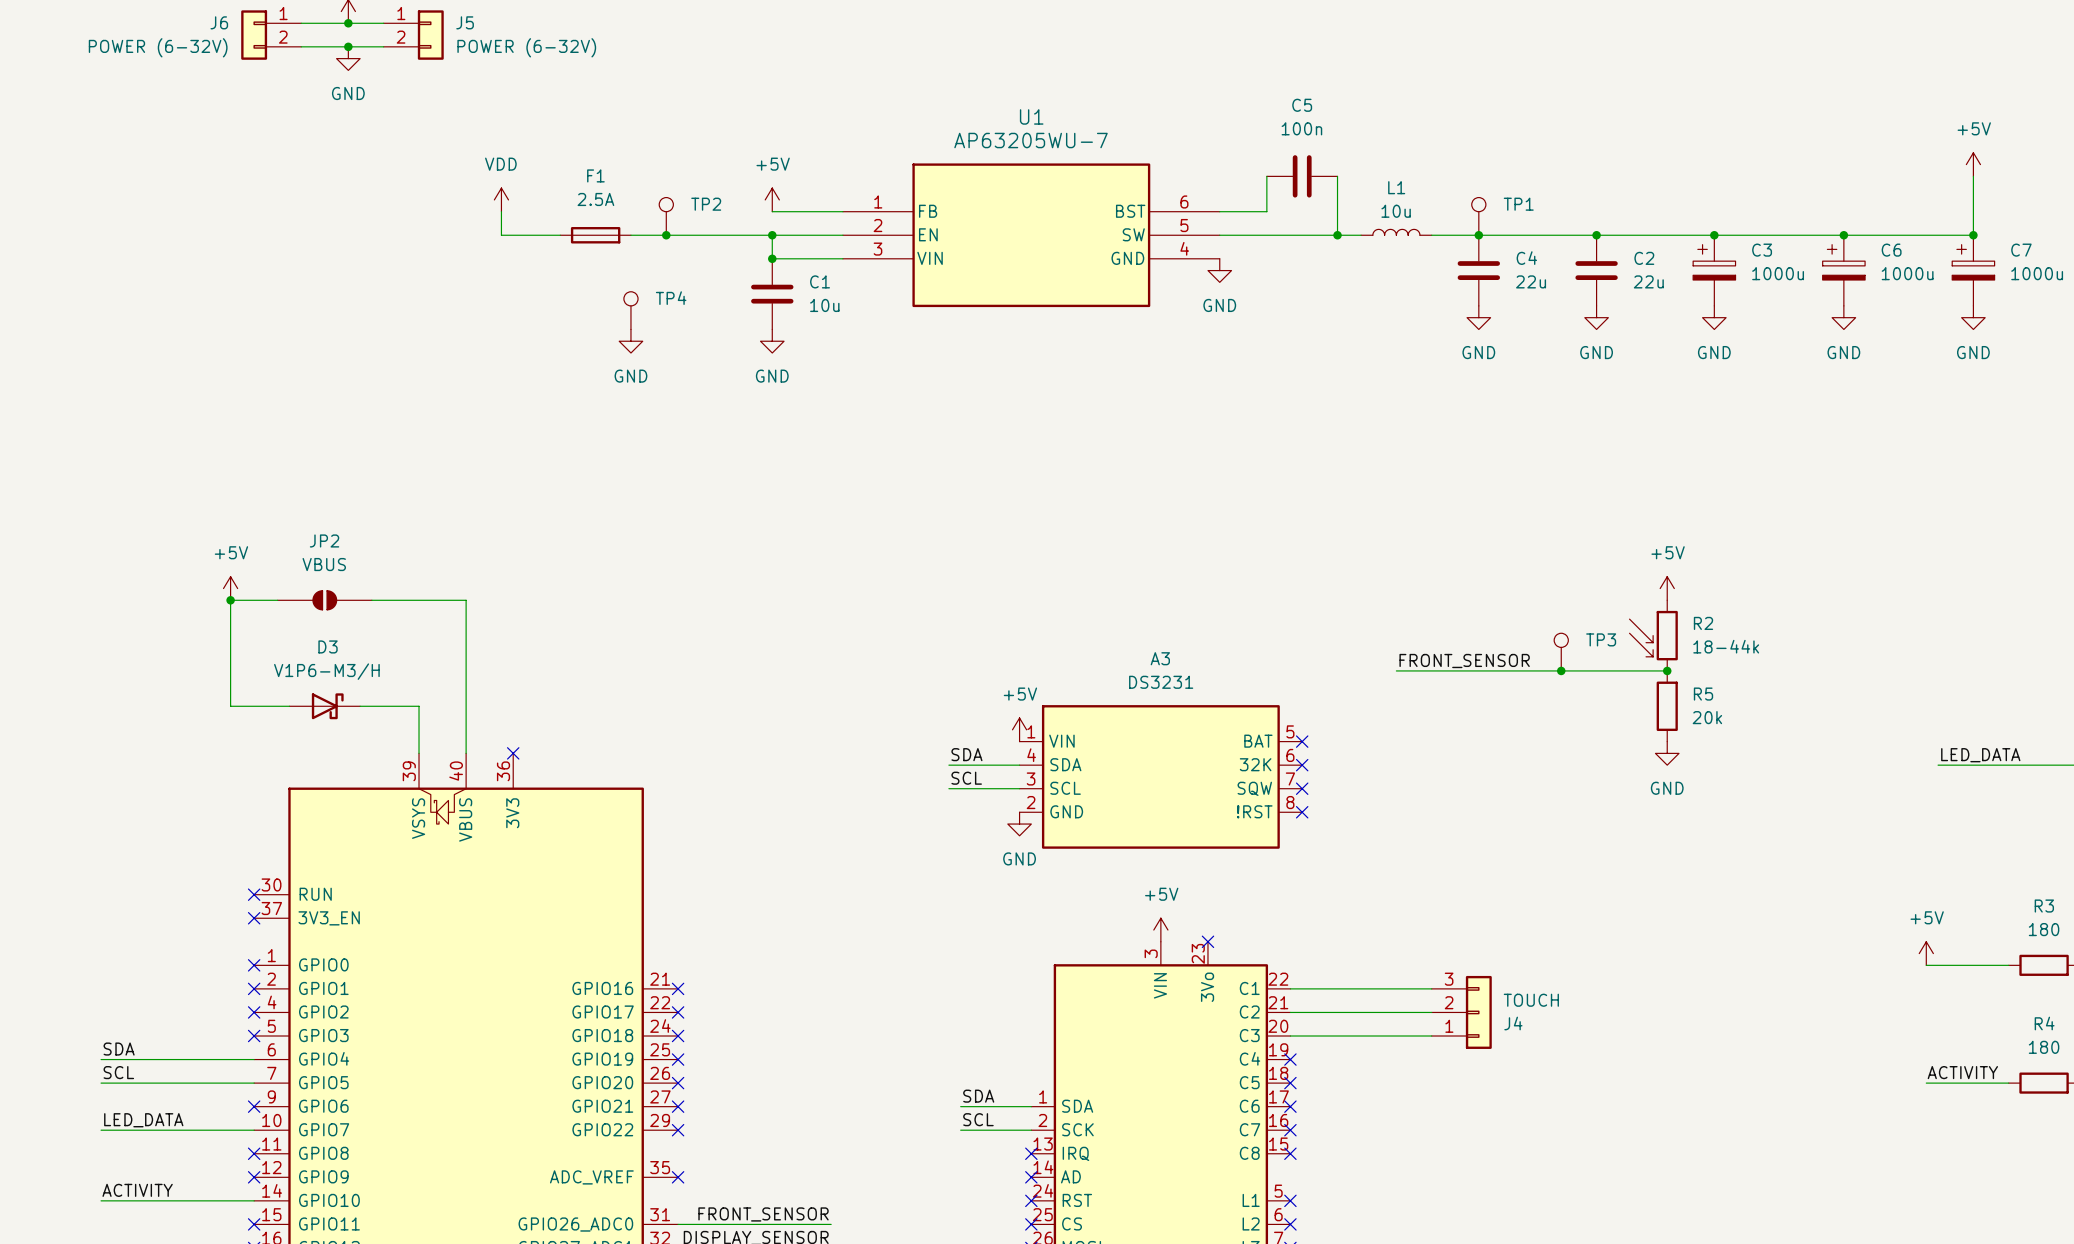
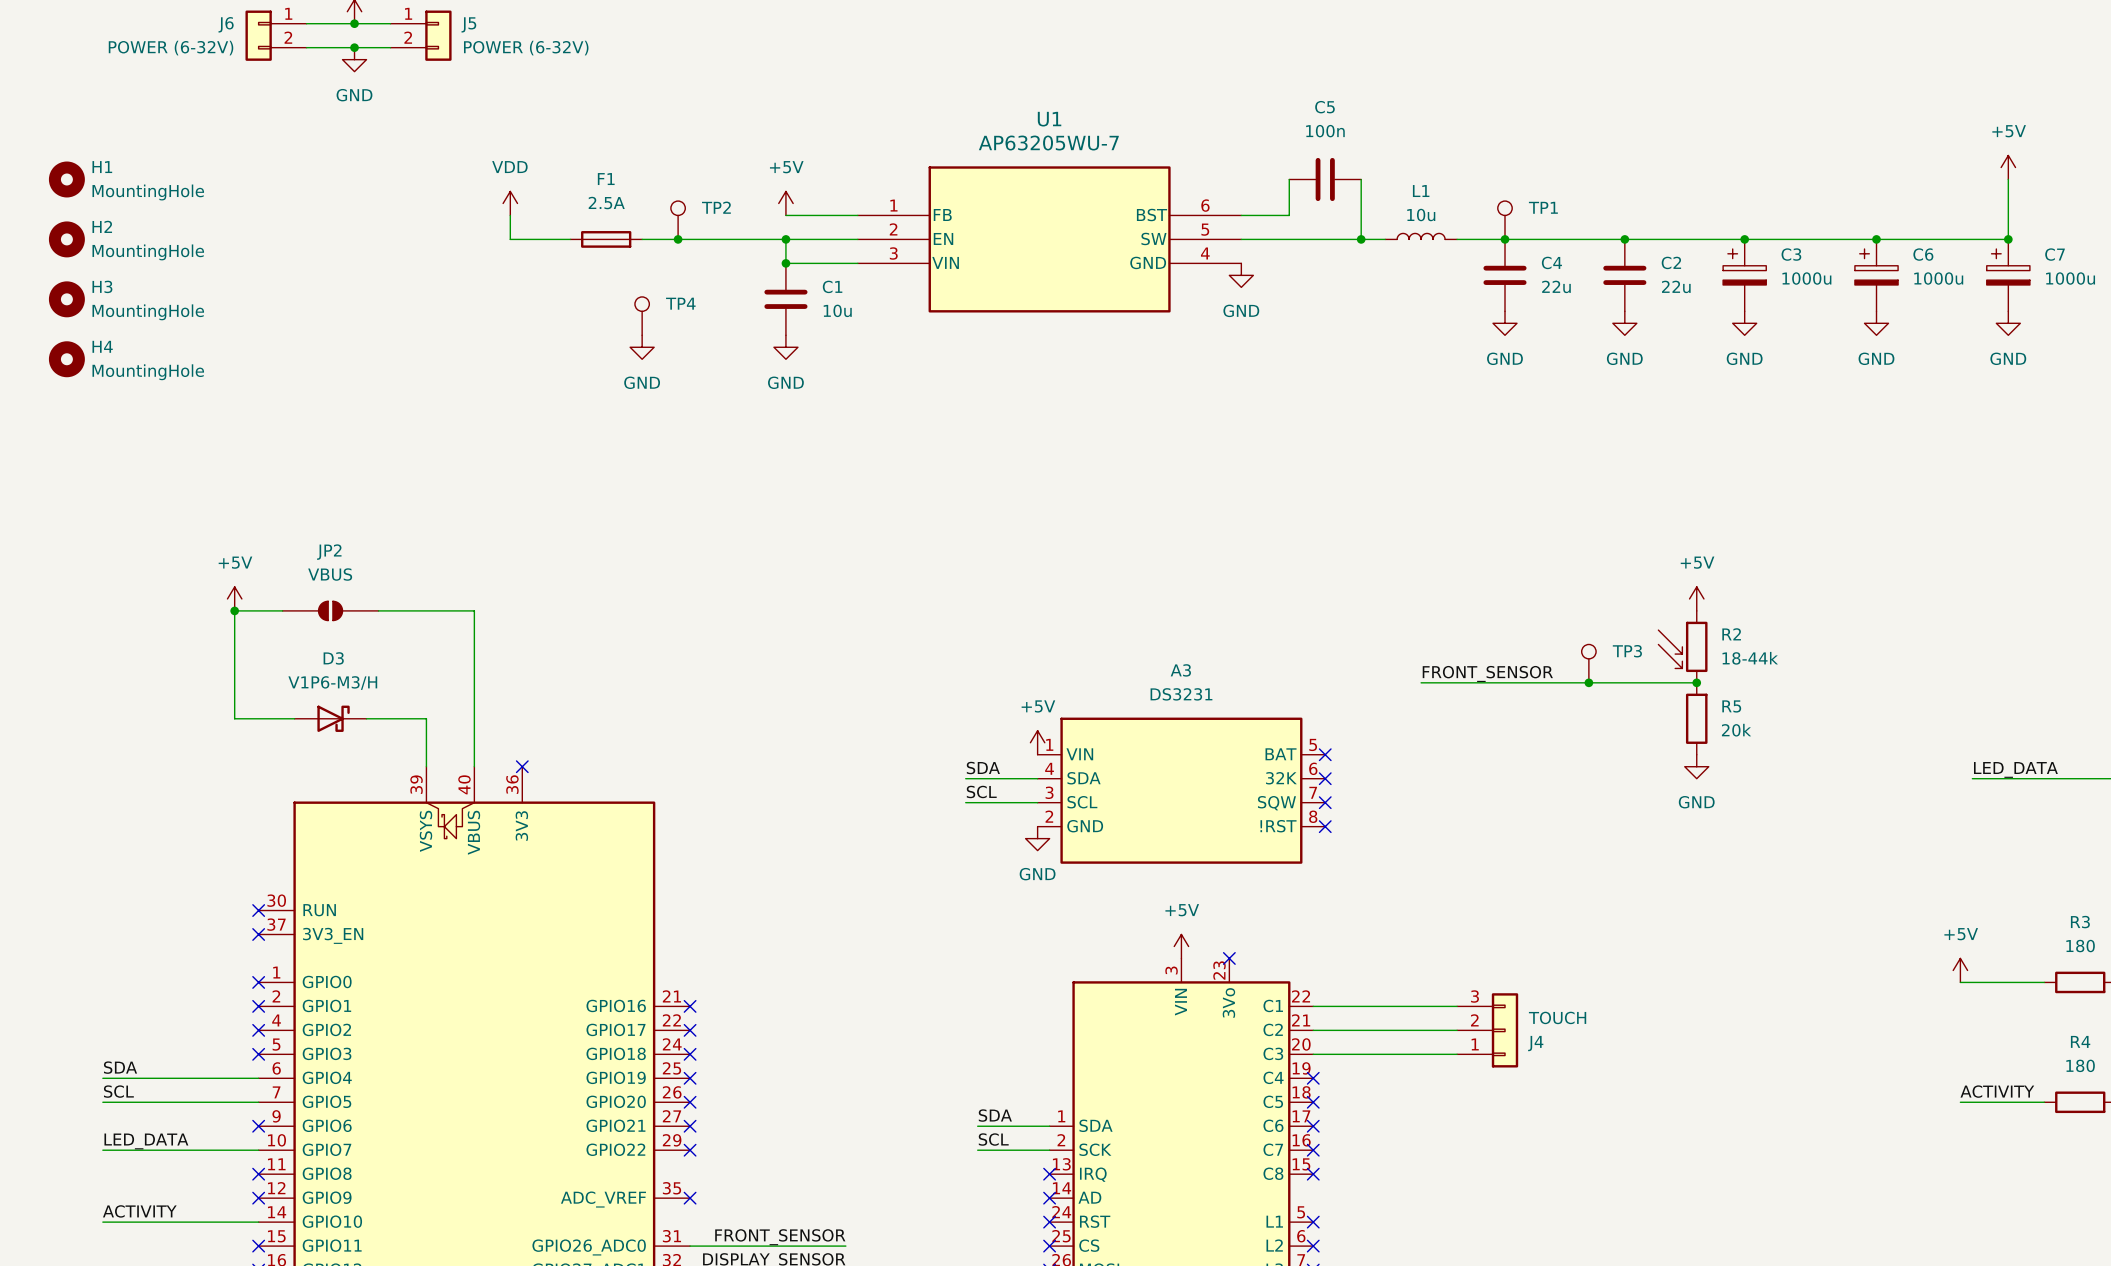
H1: none -> MountingHole (66, 179)
H2: none -> MountingHole (66, 239)
H3: none -> MountingHole (66, 299)
H4: none -> MountingHole (66, 359)

